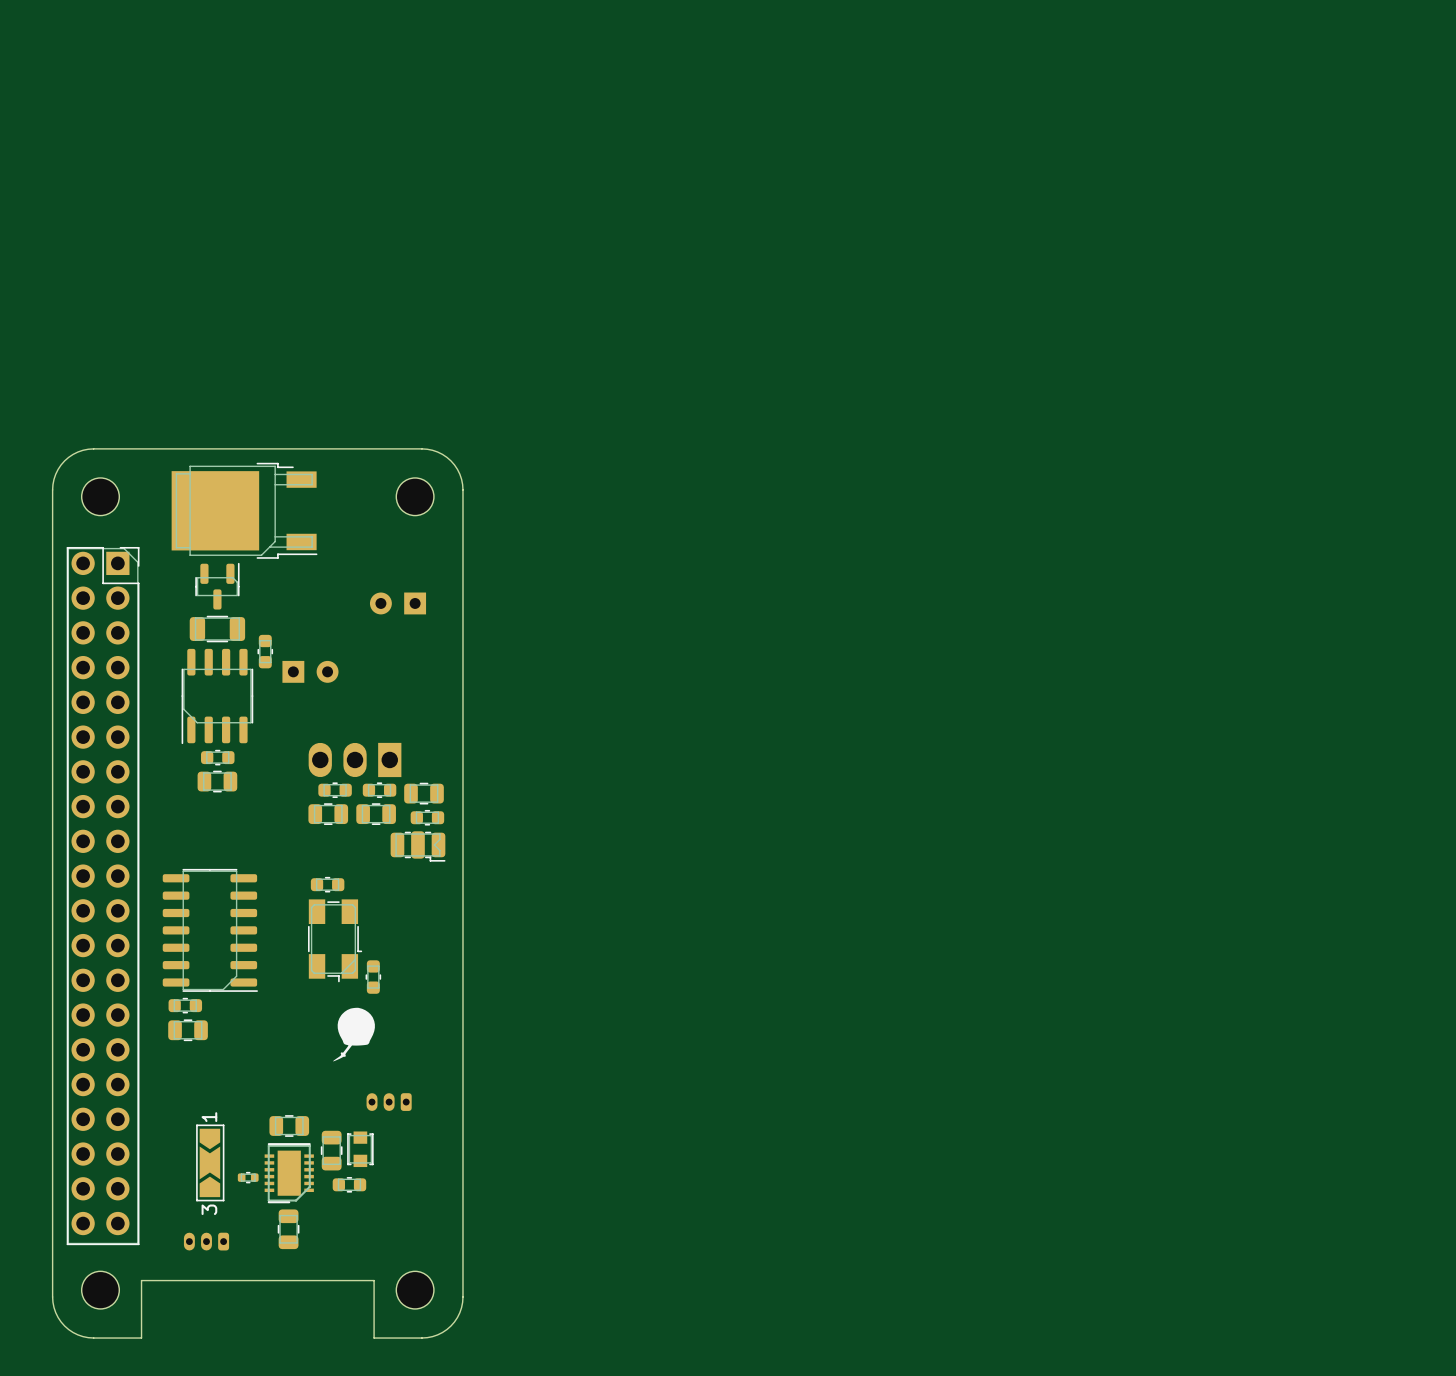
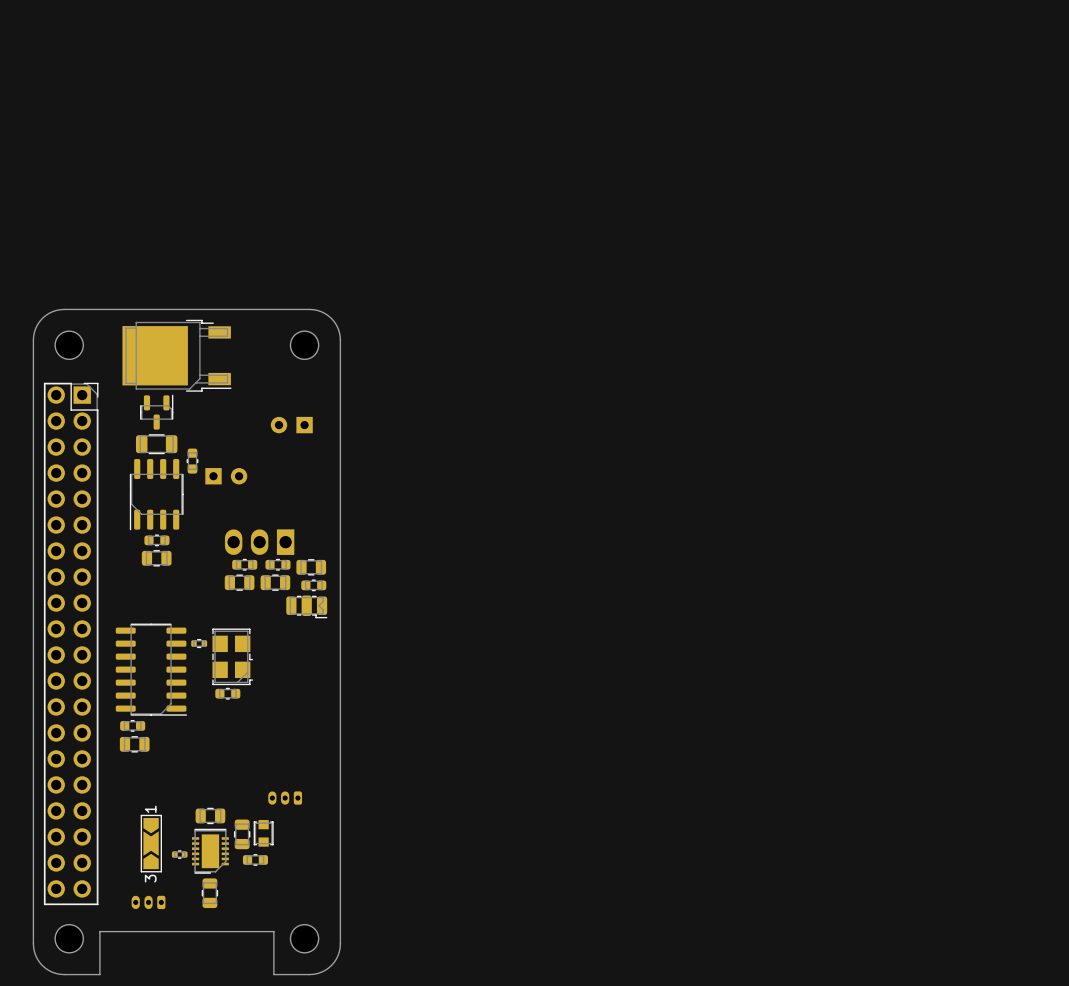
part: (327, 884) -> none
part: none -> (199, 643)
part: none -> (232, 656)
part: (335, 940) -> none
part: none -> (227, 693)
part: (373, 977) -> none
drawing: [333, 1007, 375, 1062] -> none

